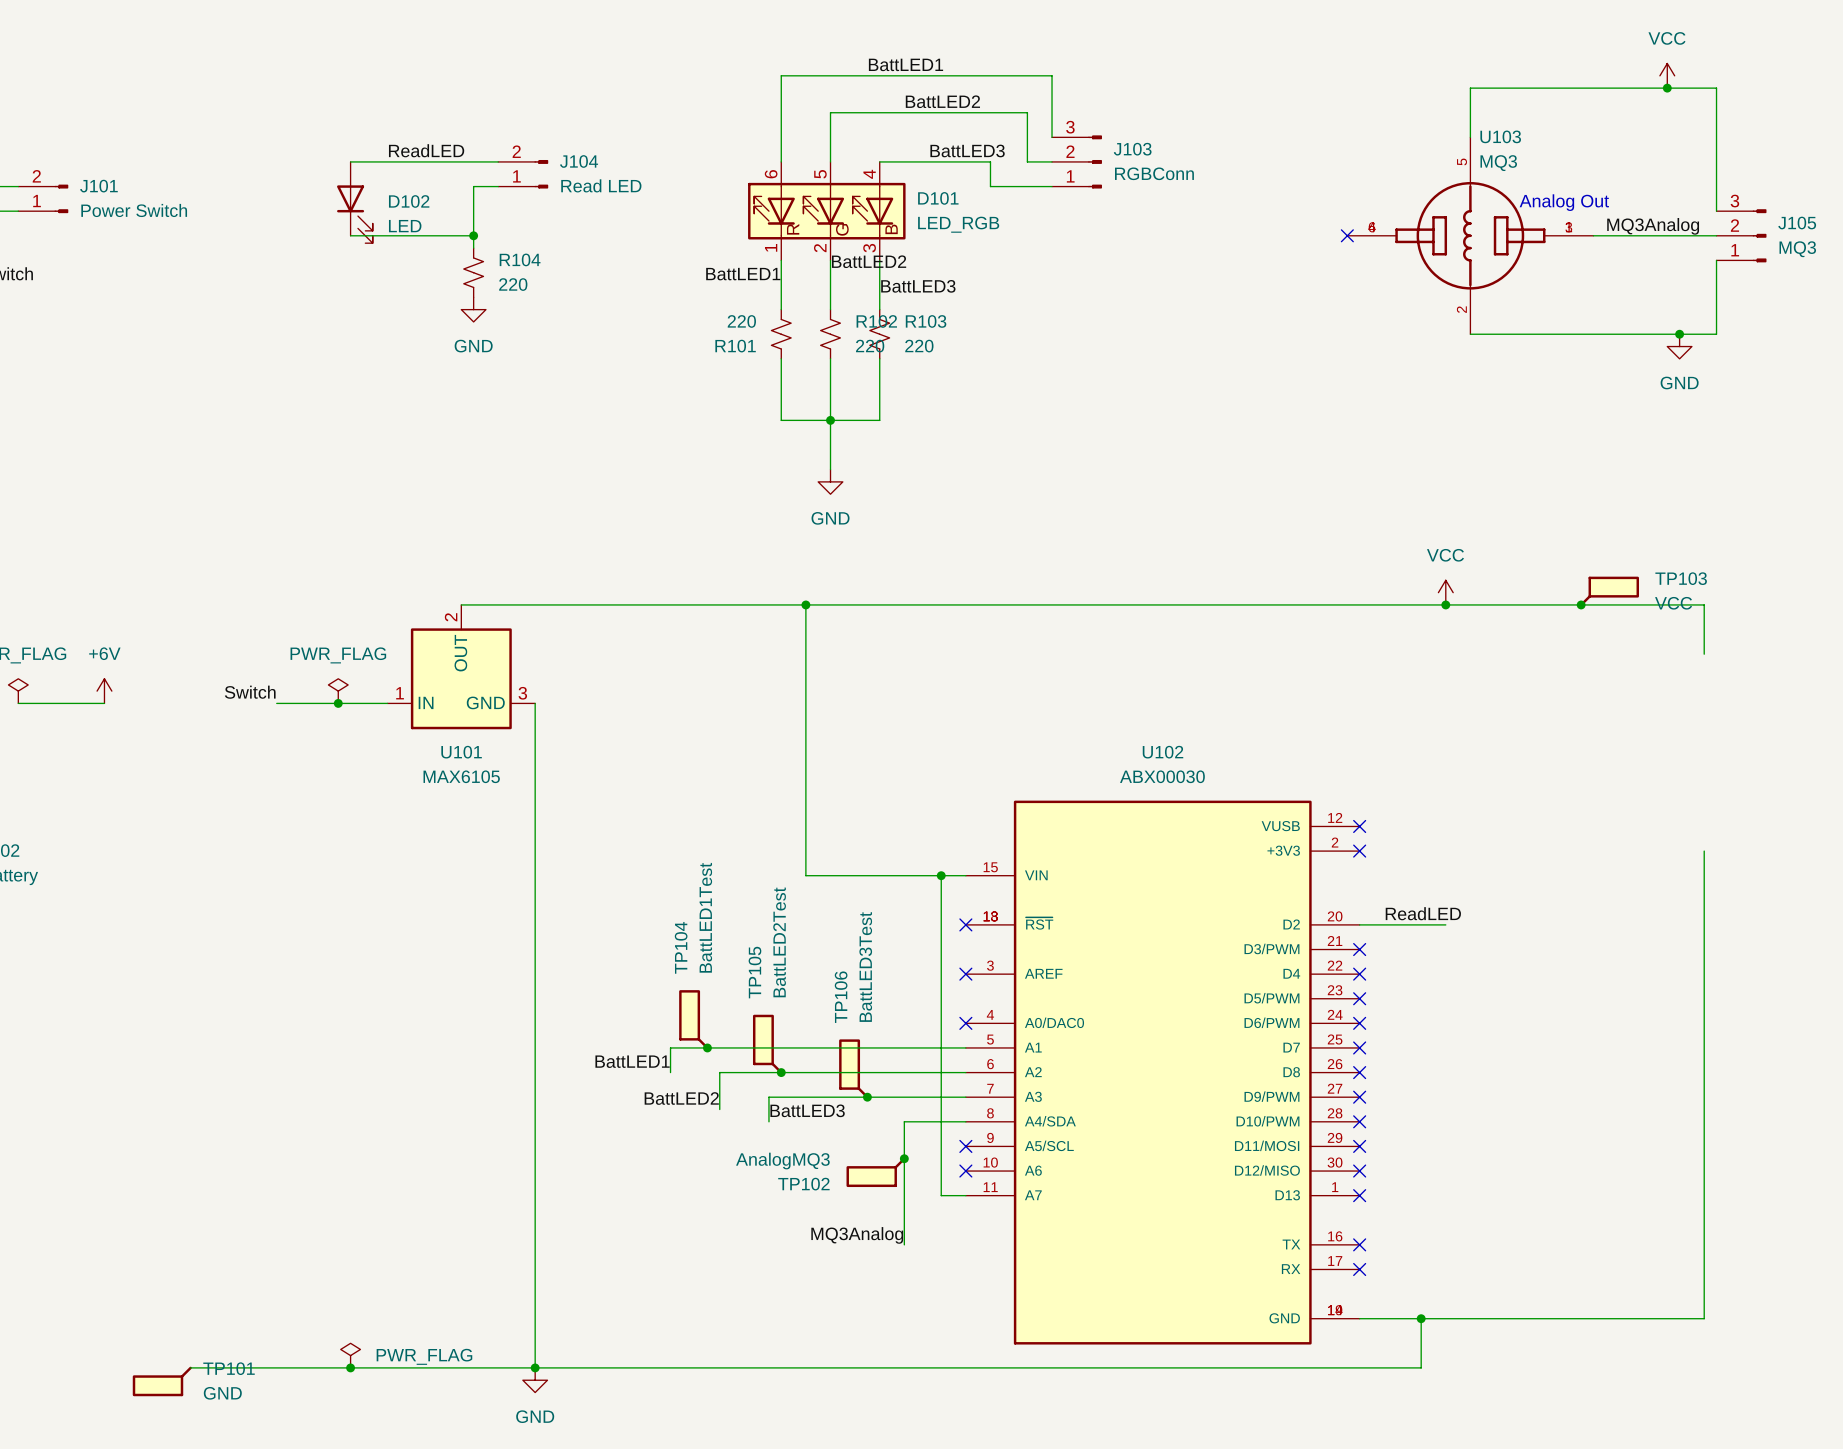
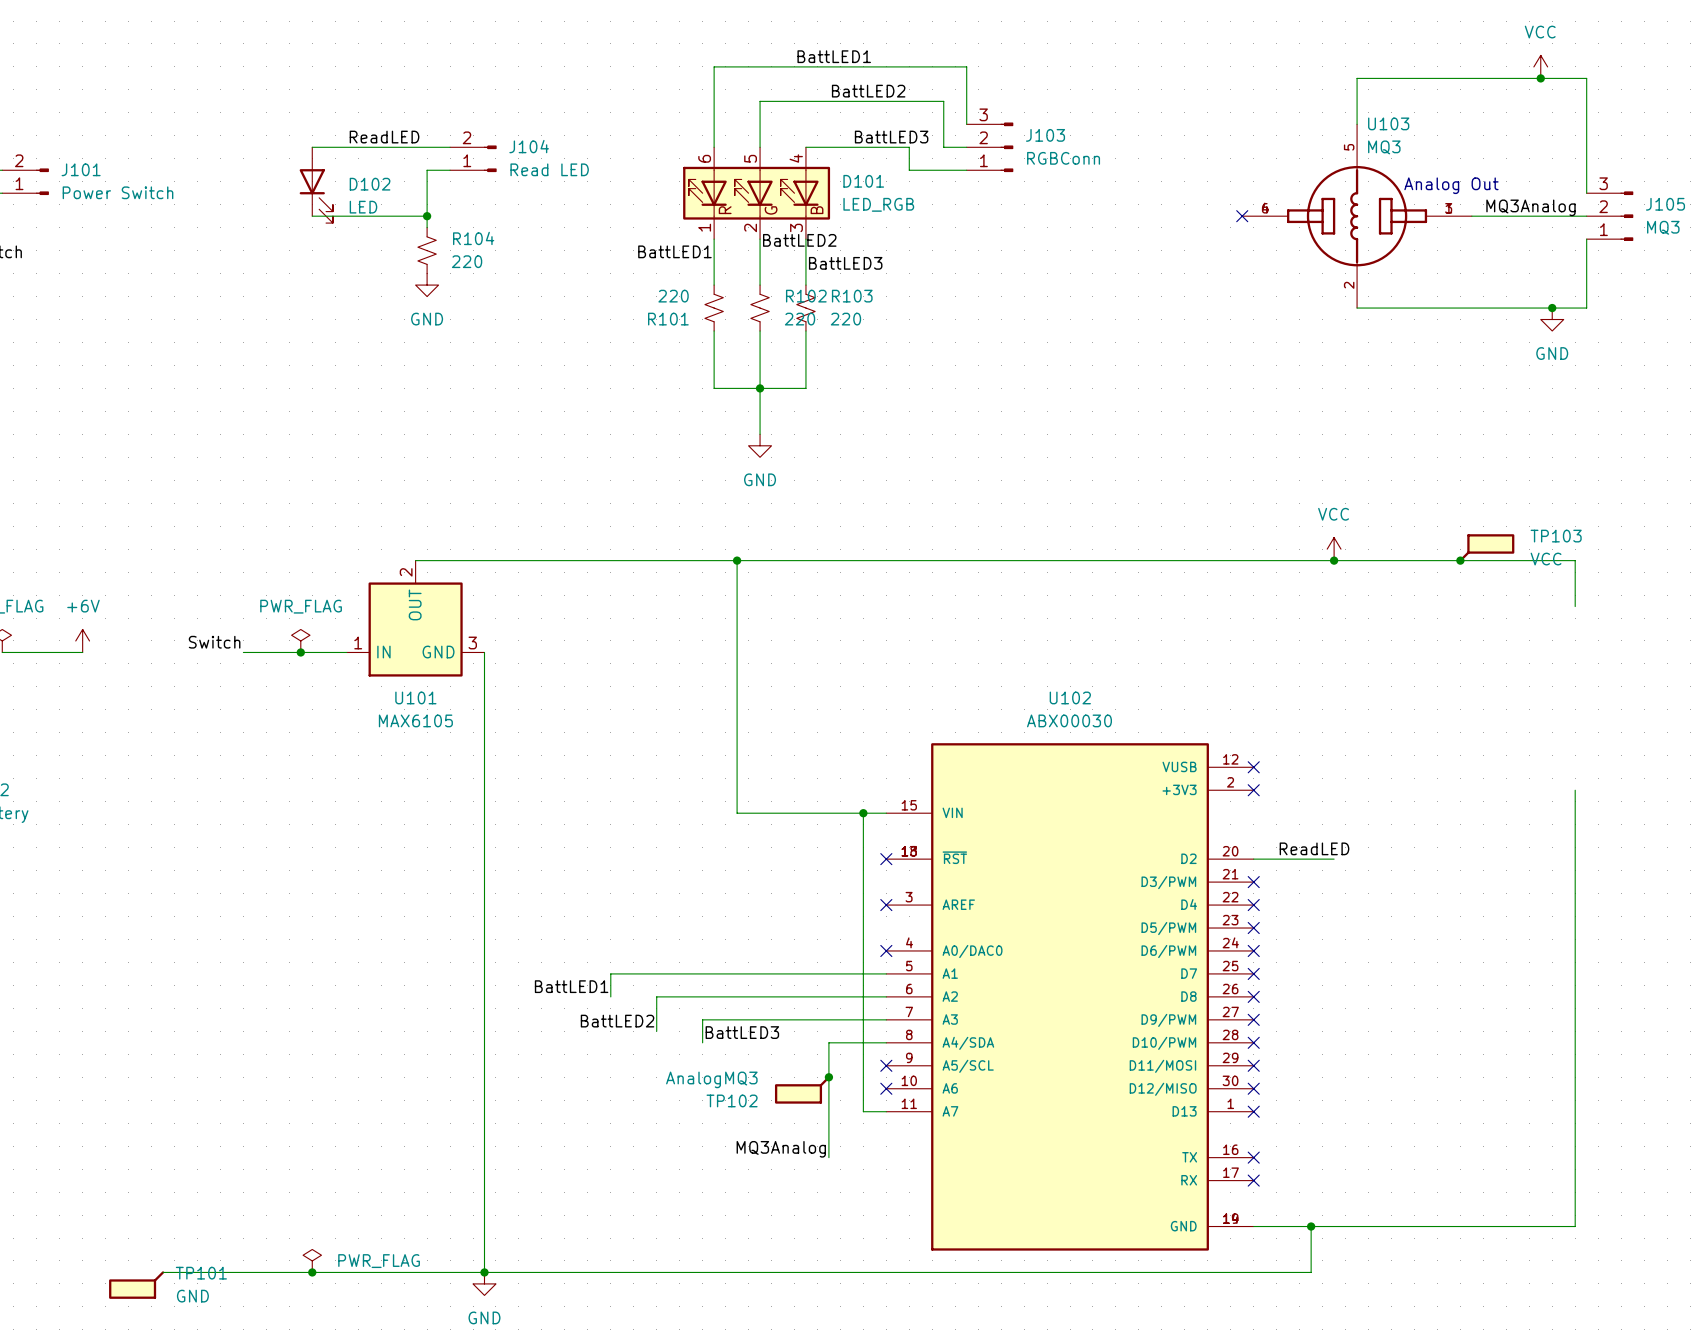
TP104: BattLED1Test (693, 1019) -> none
TP105: BattLED2Test (767, 1044) -> none
junction: (707, 1047) -> none
TP106: BattLED3Test (853, 1068) -> none
junction: (781, 1072) -> none
junction: (867, 1097) -> none

